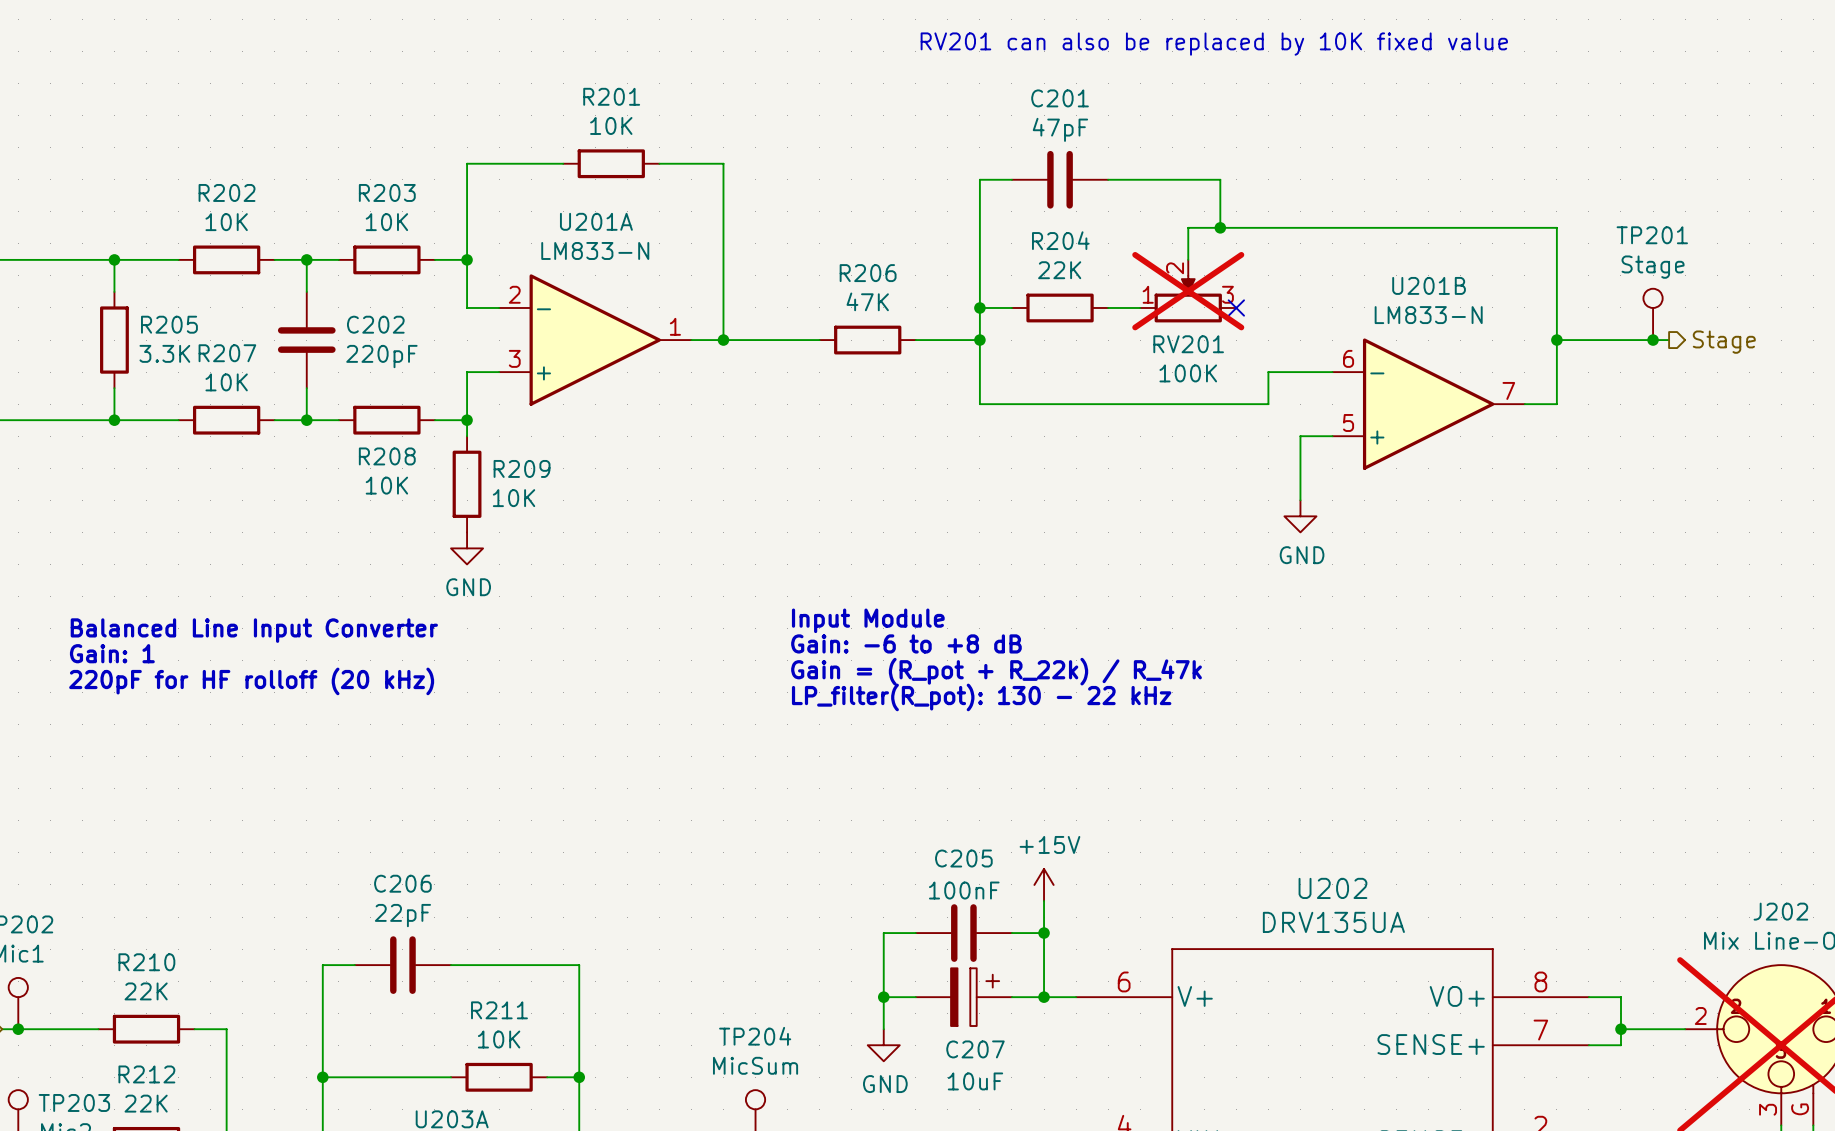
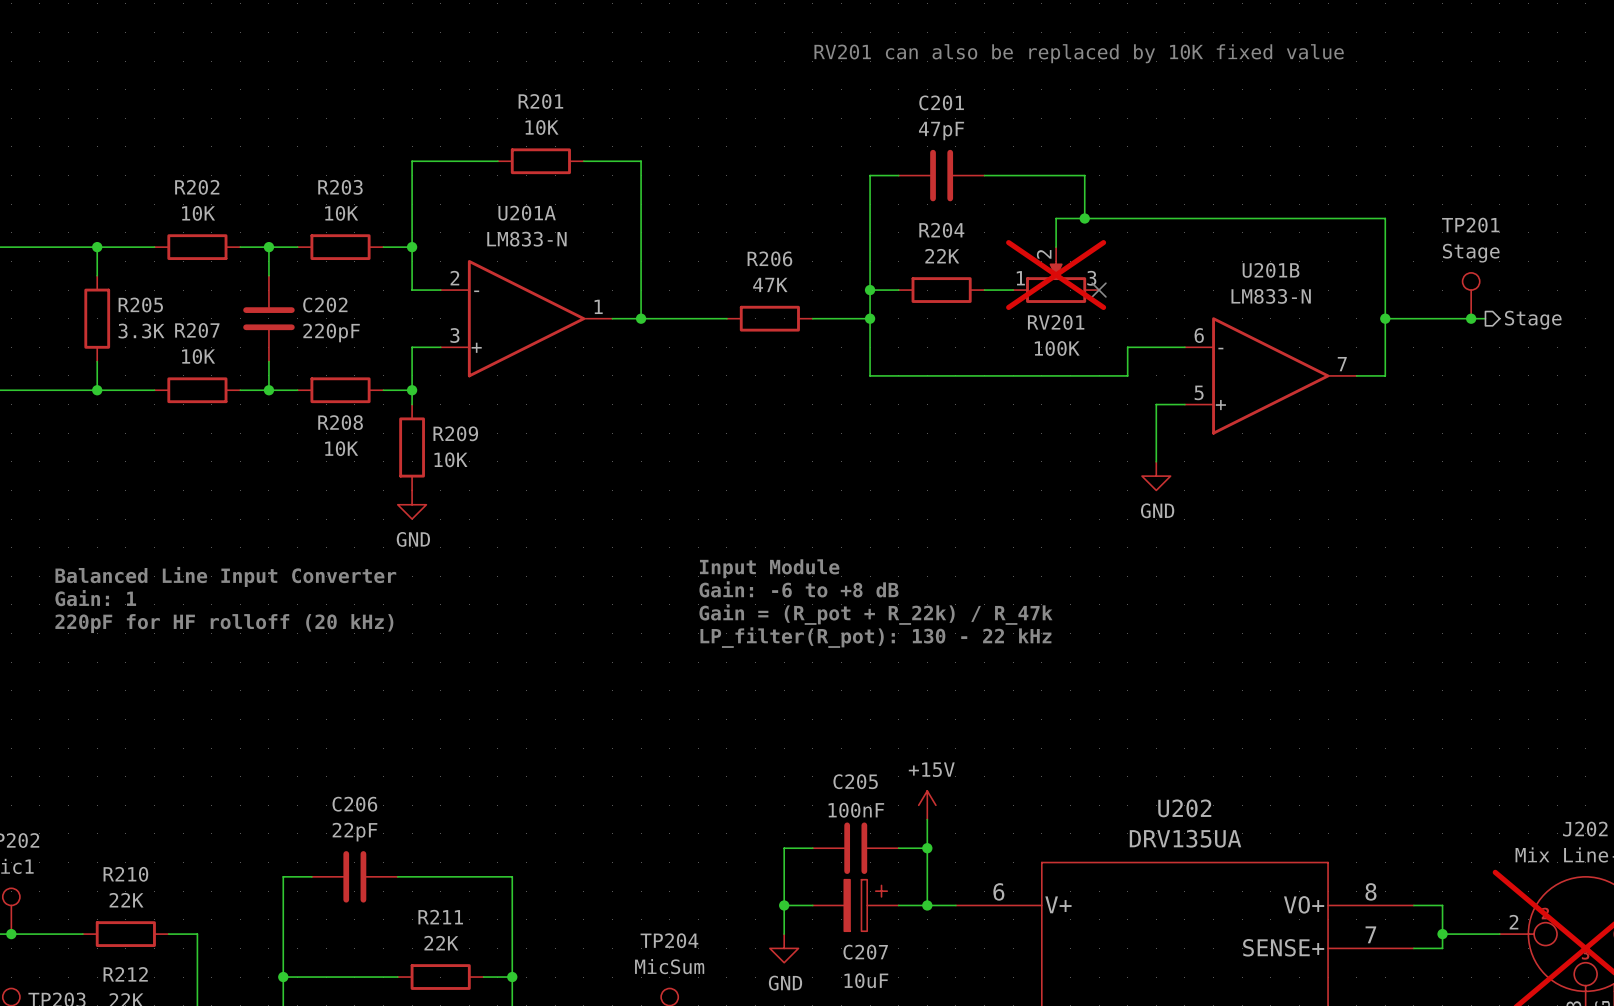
R211 value: 10K (499, 1039) -> 22K (441, 943)

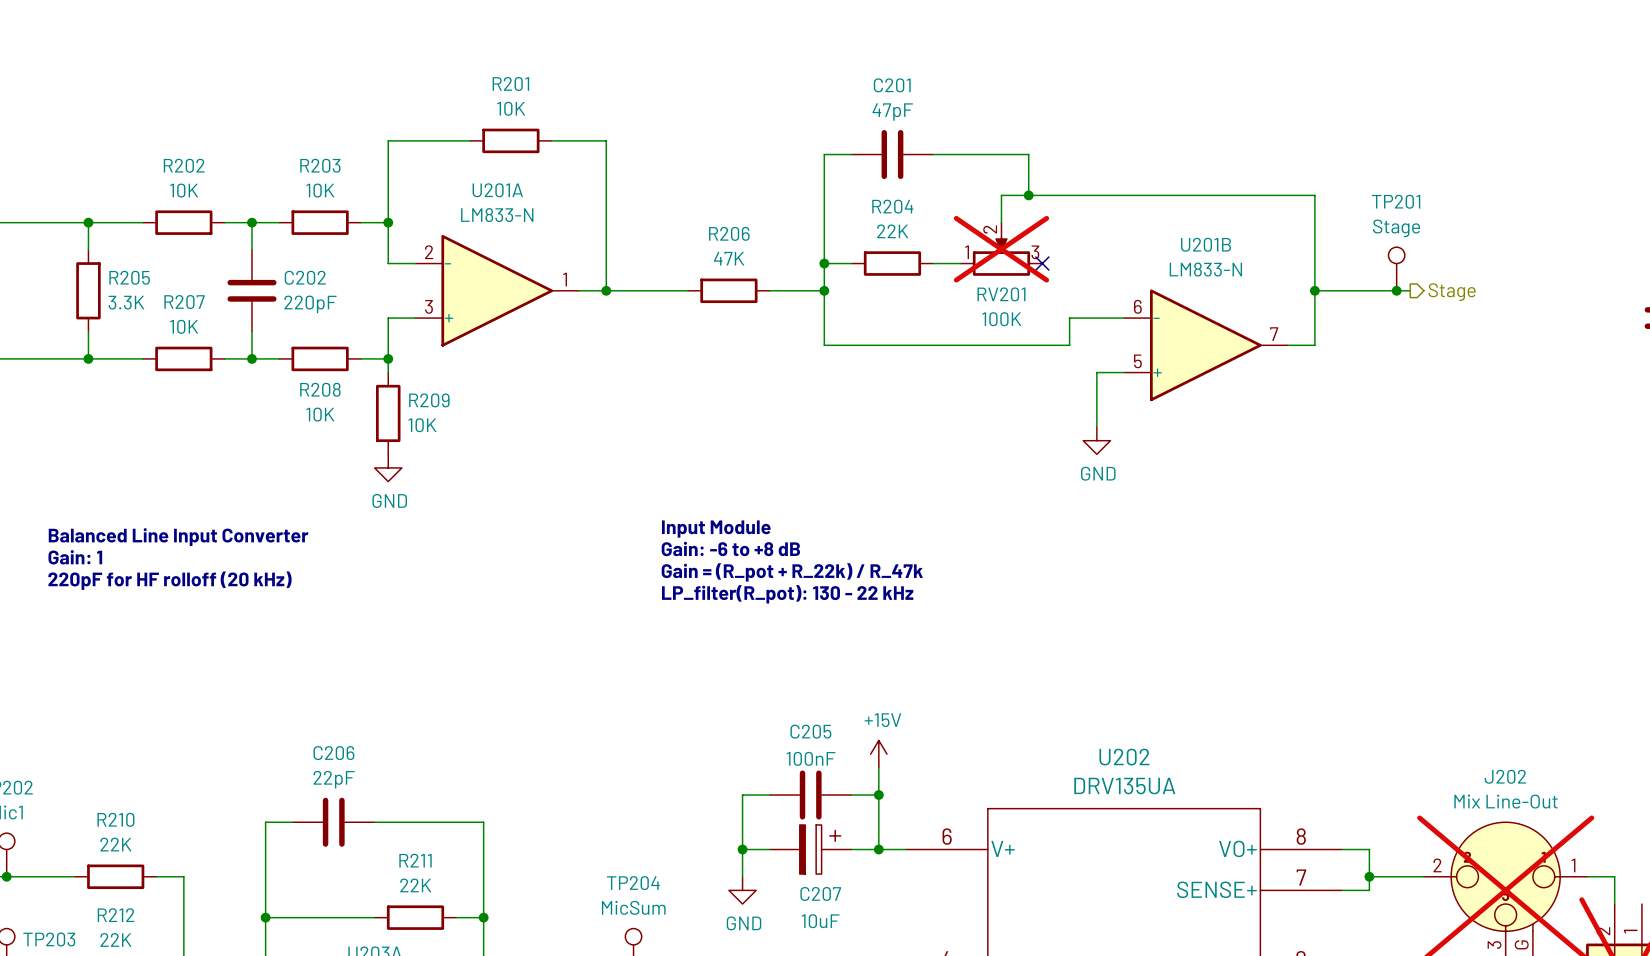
text: RV201 can also be replaced by 10K fixed value (1079, 53) -> none

